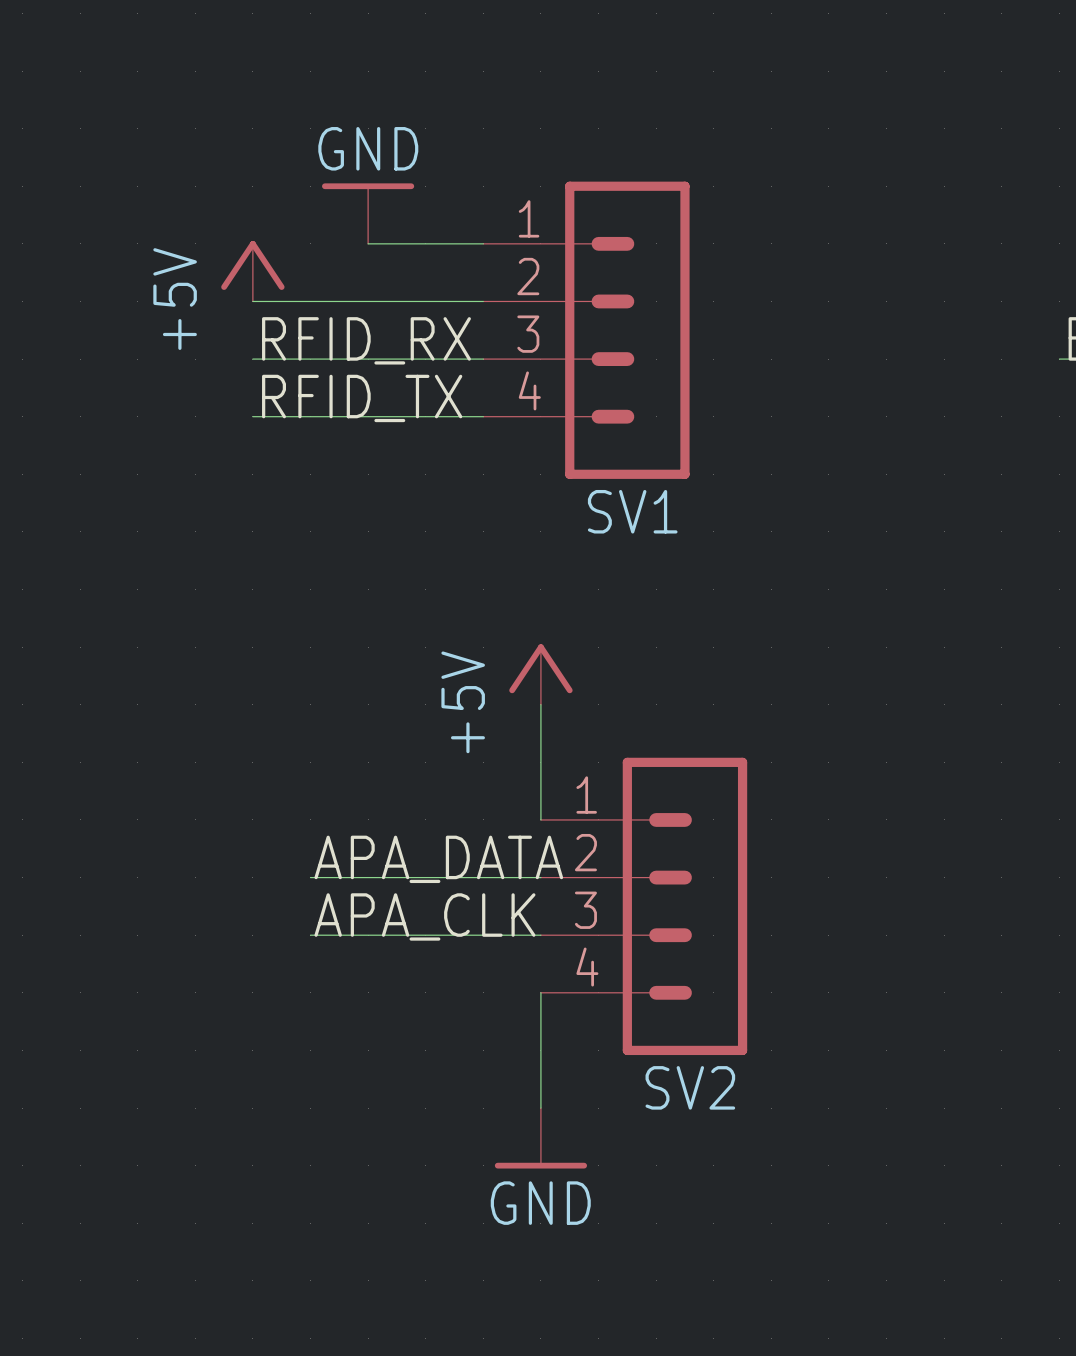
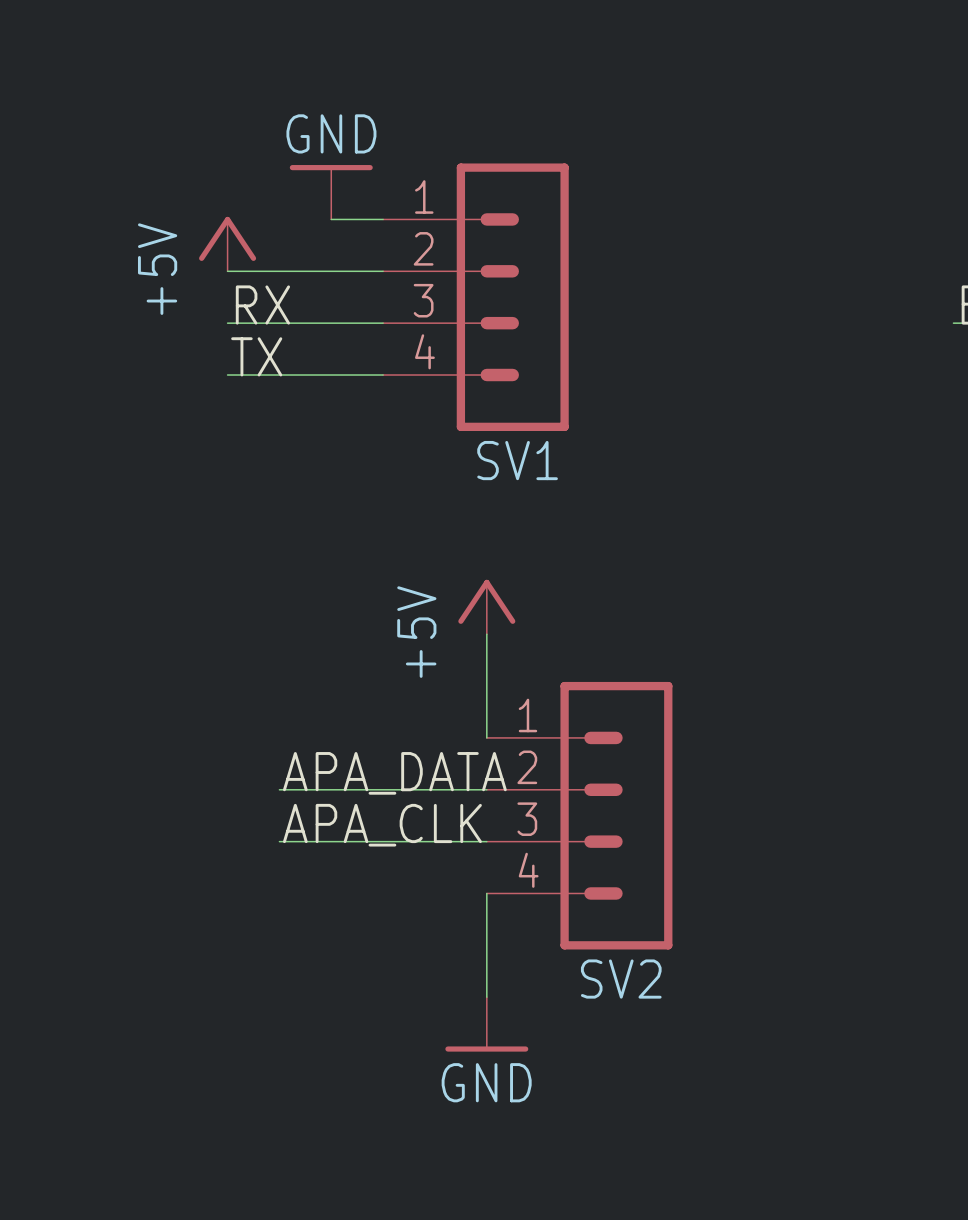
SV1 position: (586, 330) -> (475, 297)
label: RFID_RX (366, 340) -> RX (262, 305)
label: RFID_TX (362, 398) -> TX (256, 356)

